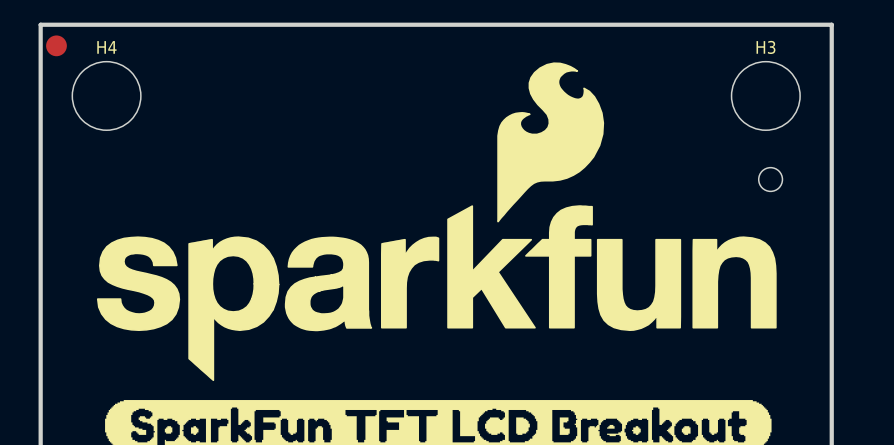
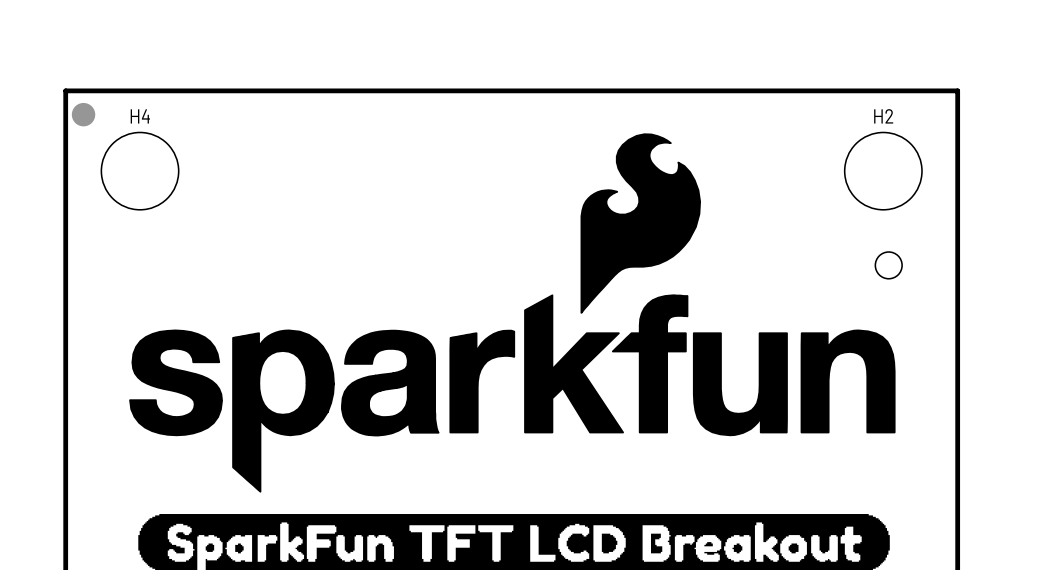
H3 name: H3 (765, 47) -> H2 (883, 116)

